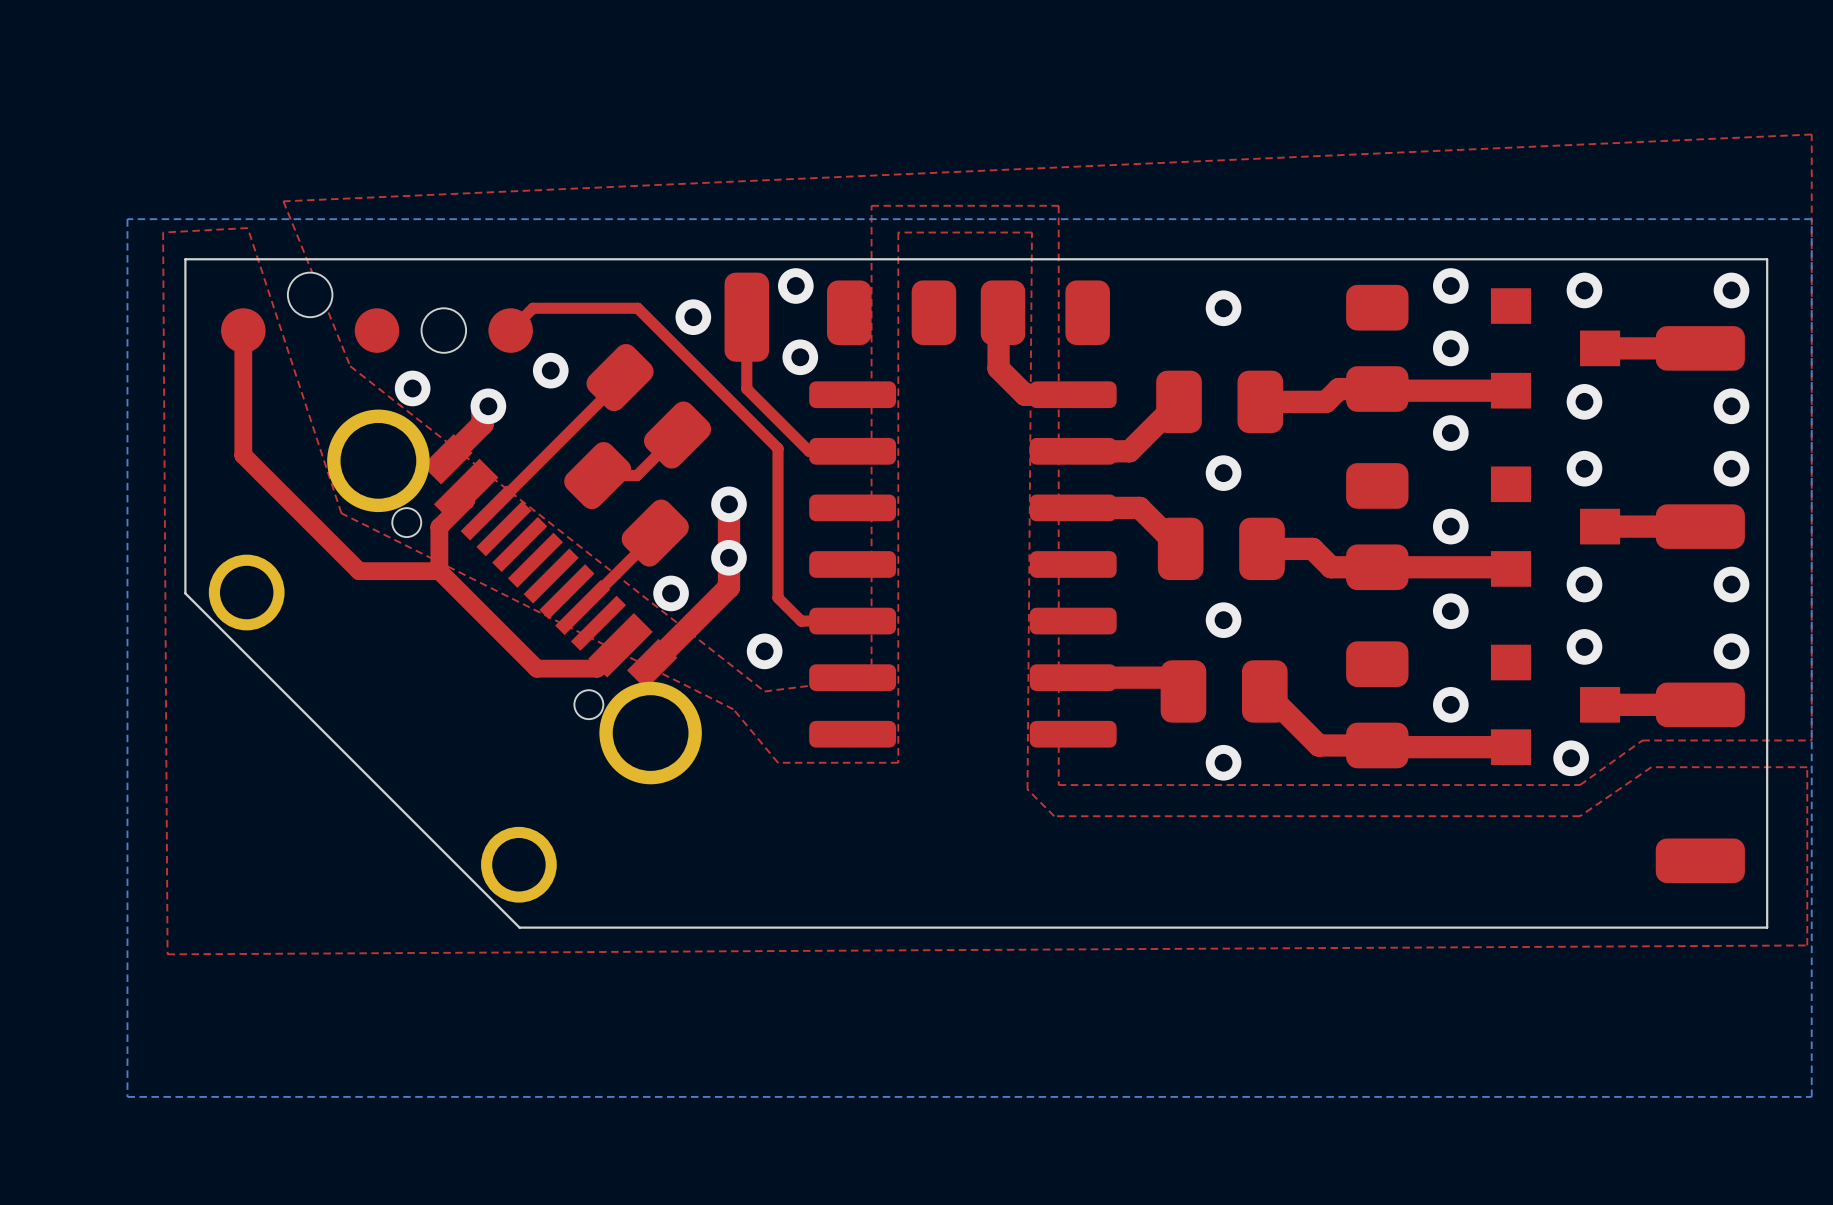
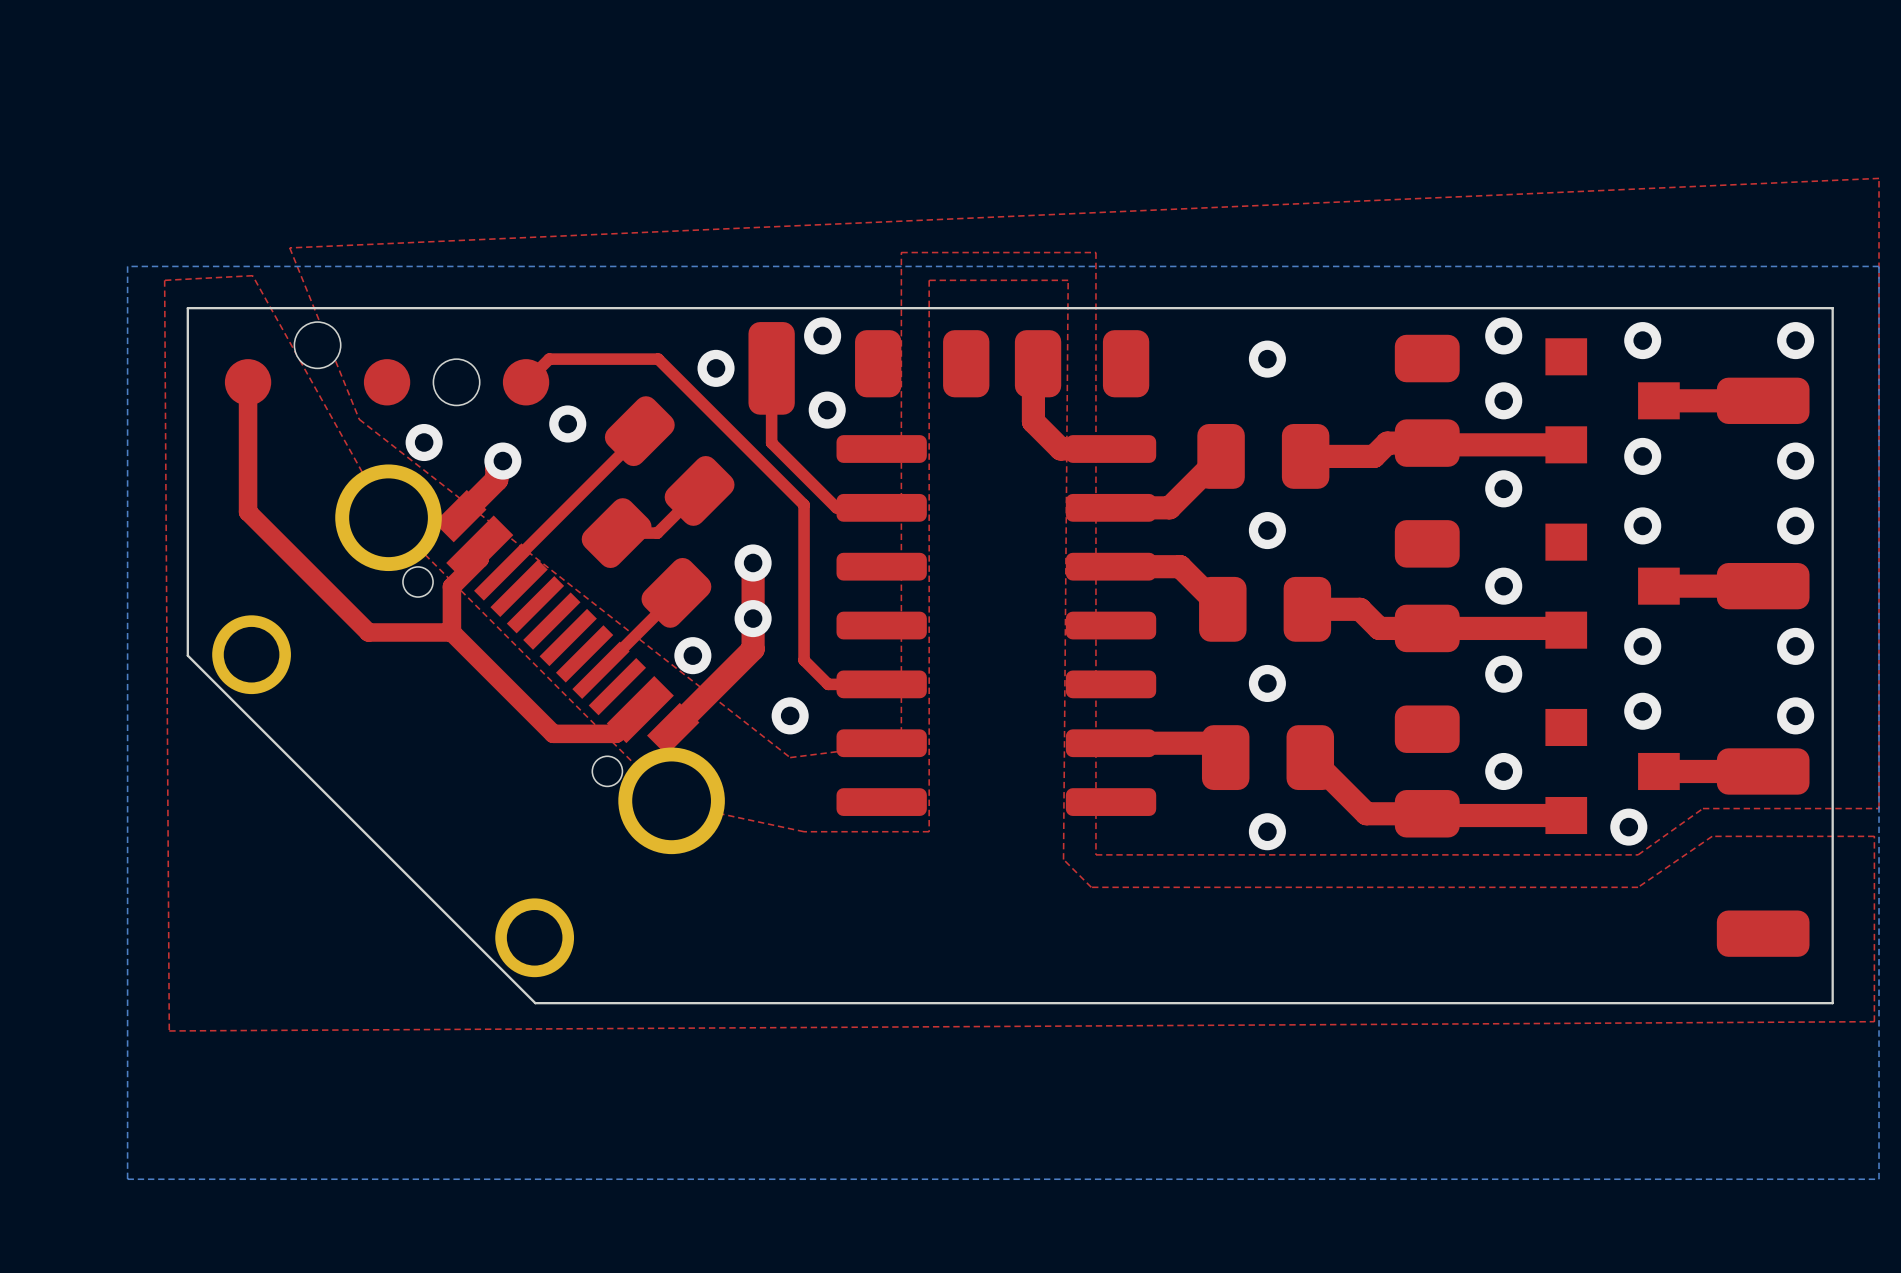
top zone outline: (247, 228) (341, 513) (733, 709) (778, 762) -> (252, 275) (387, 516) (674, 803) (804, 831)

